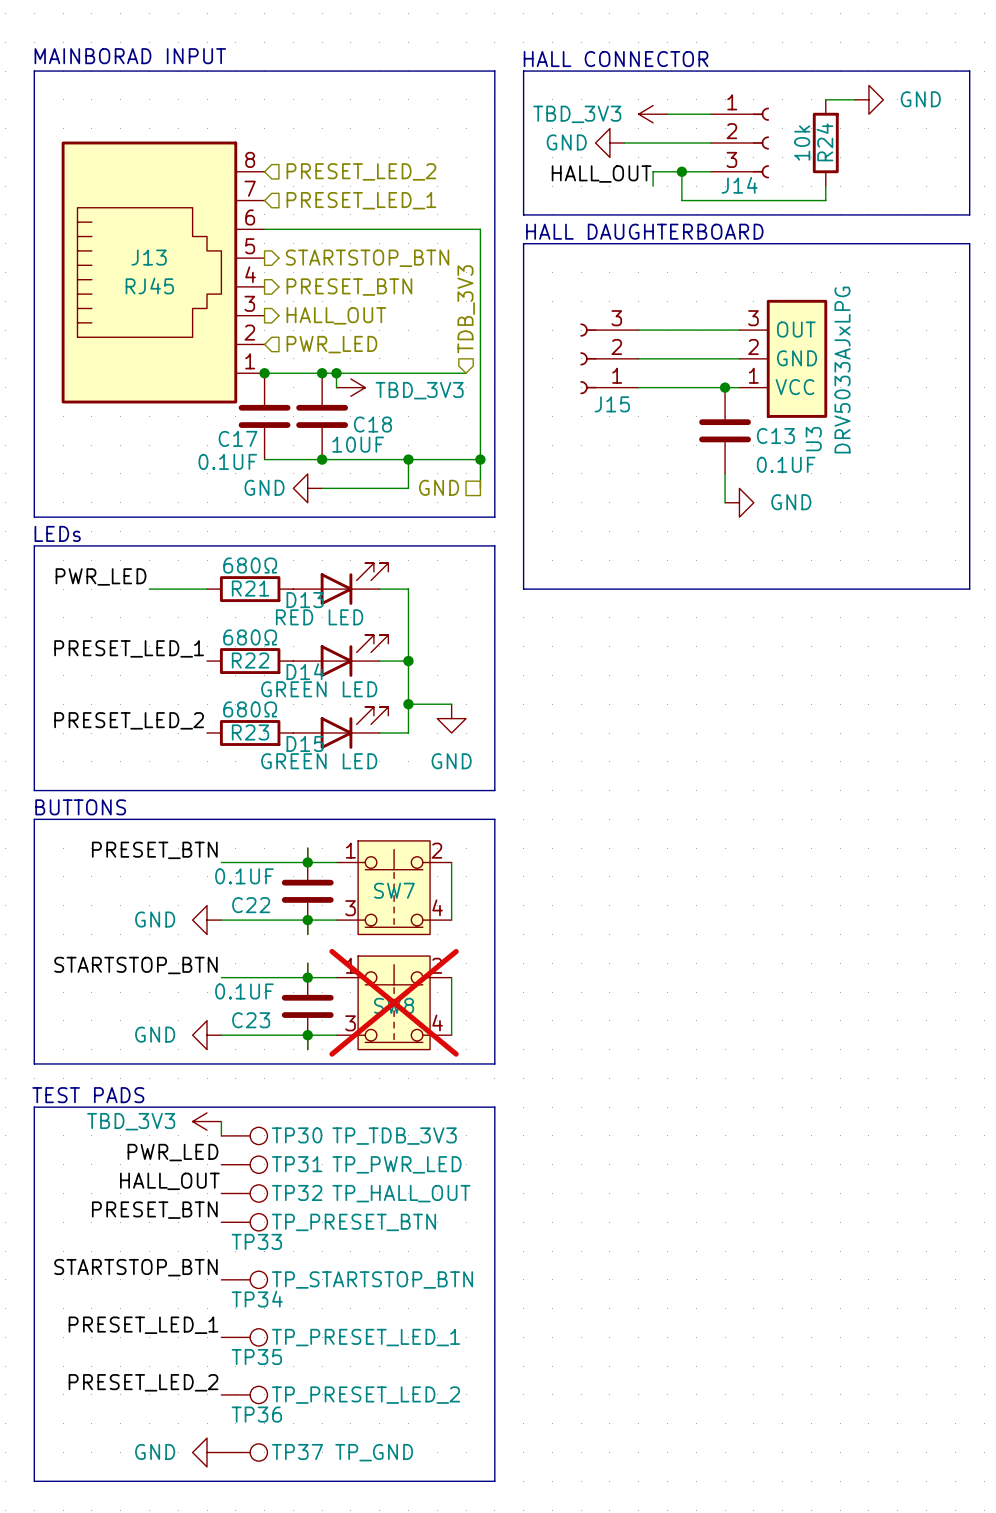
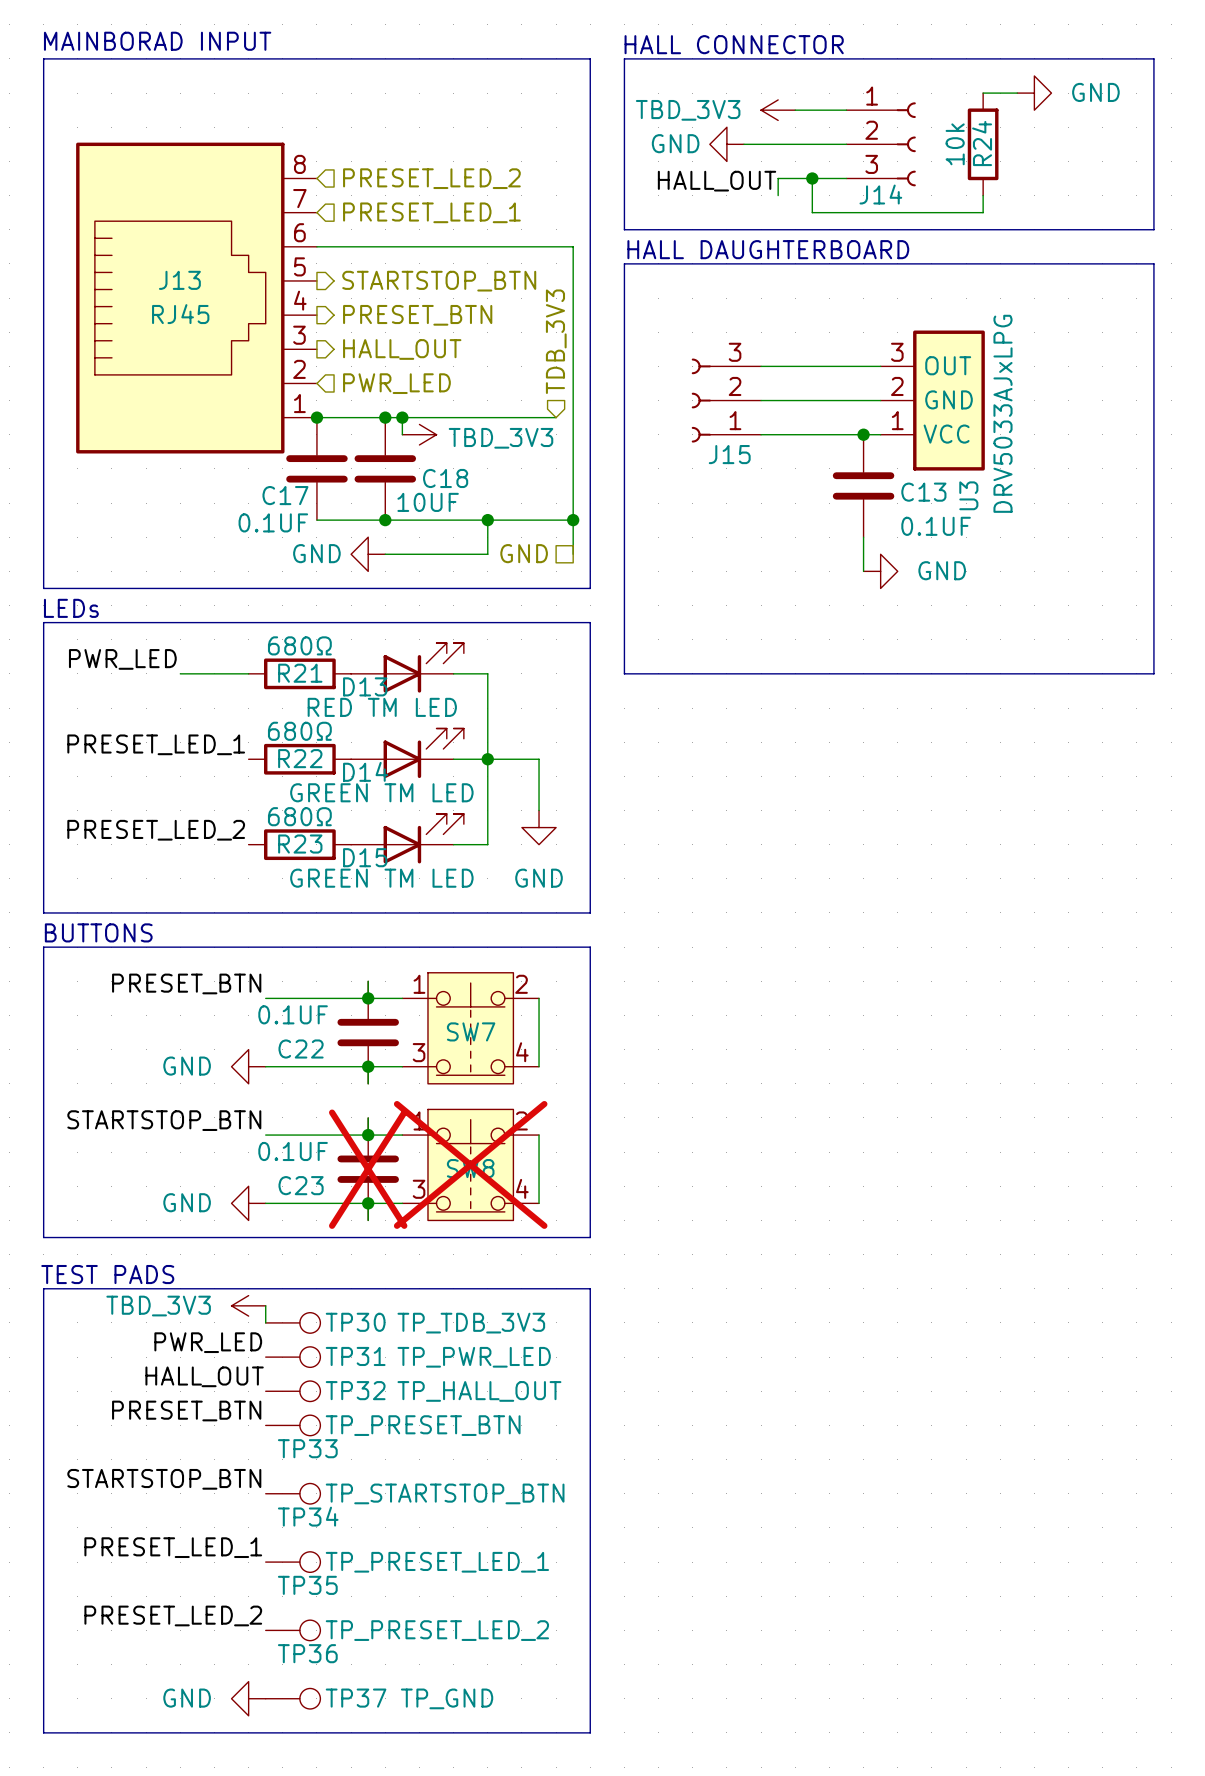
D13 value: RED LED (319, 617) -> RED TM LED (382, 707)
D14 value: GREEN LED (319, 689) -> GREEN TM LED (381, 792)
wire: (408, 704) (451, 704) -> (487, 759) (539, 759) (539, 810)
junction: (408, 704) -> none
D15 value: GREEN LED (319, 761) -> GREEN TM LED (381, 878)
C23 do-not-place cross: none -> (368, 1169)

